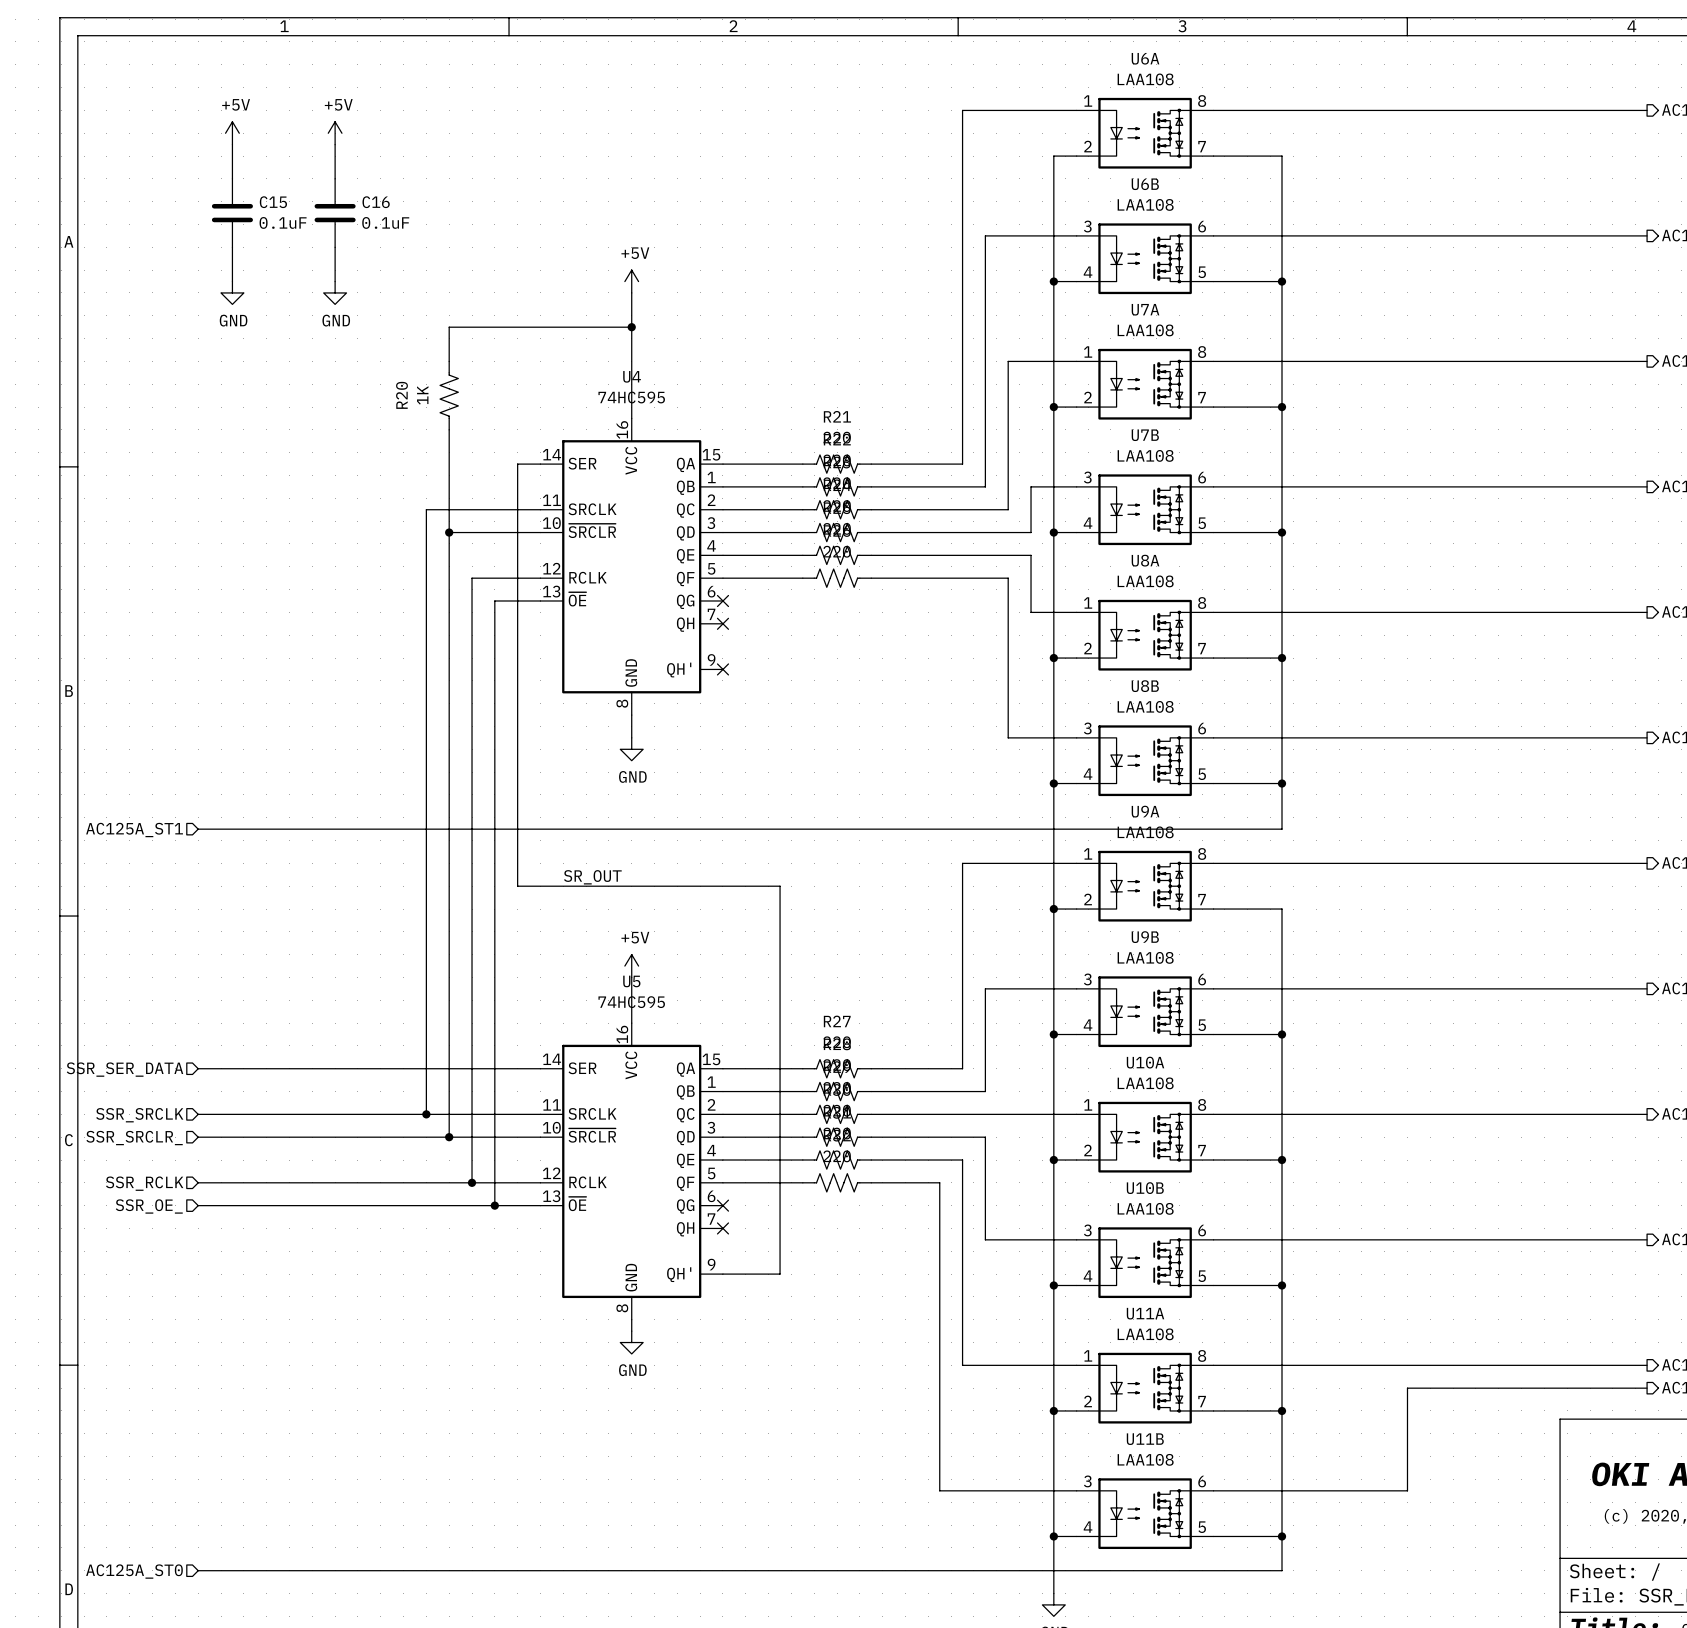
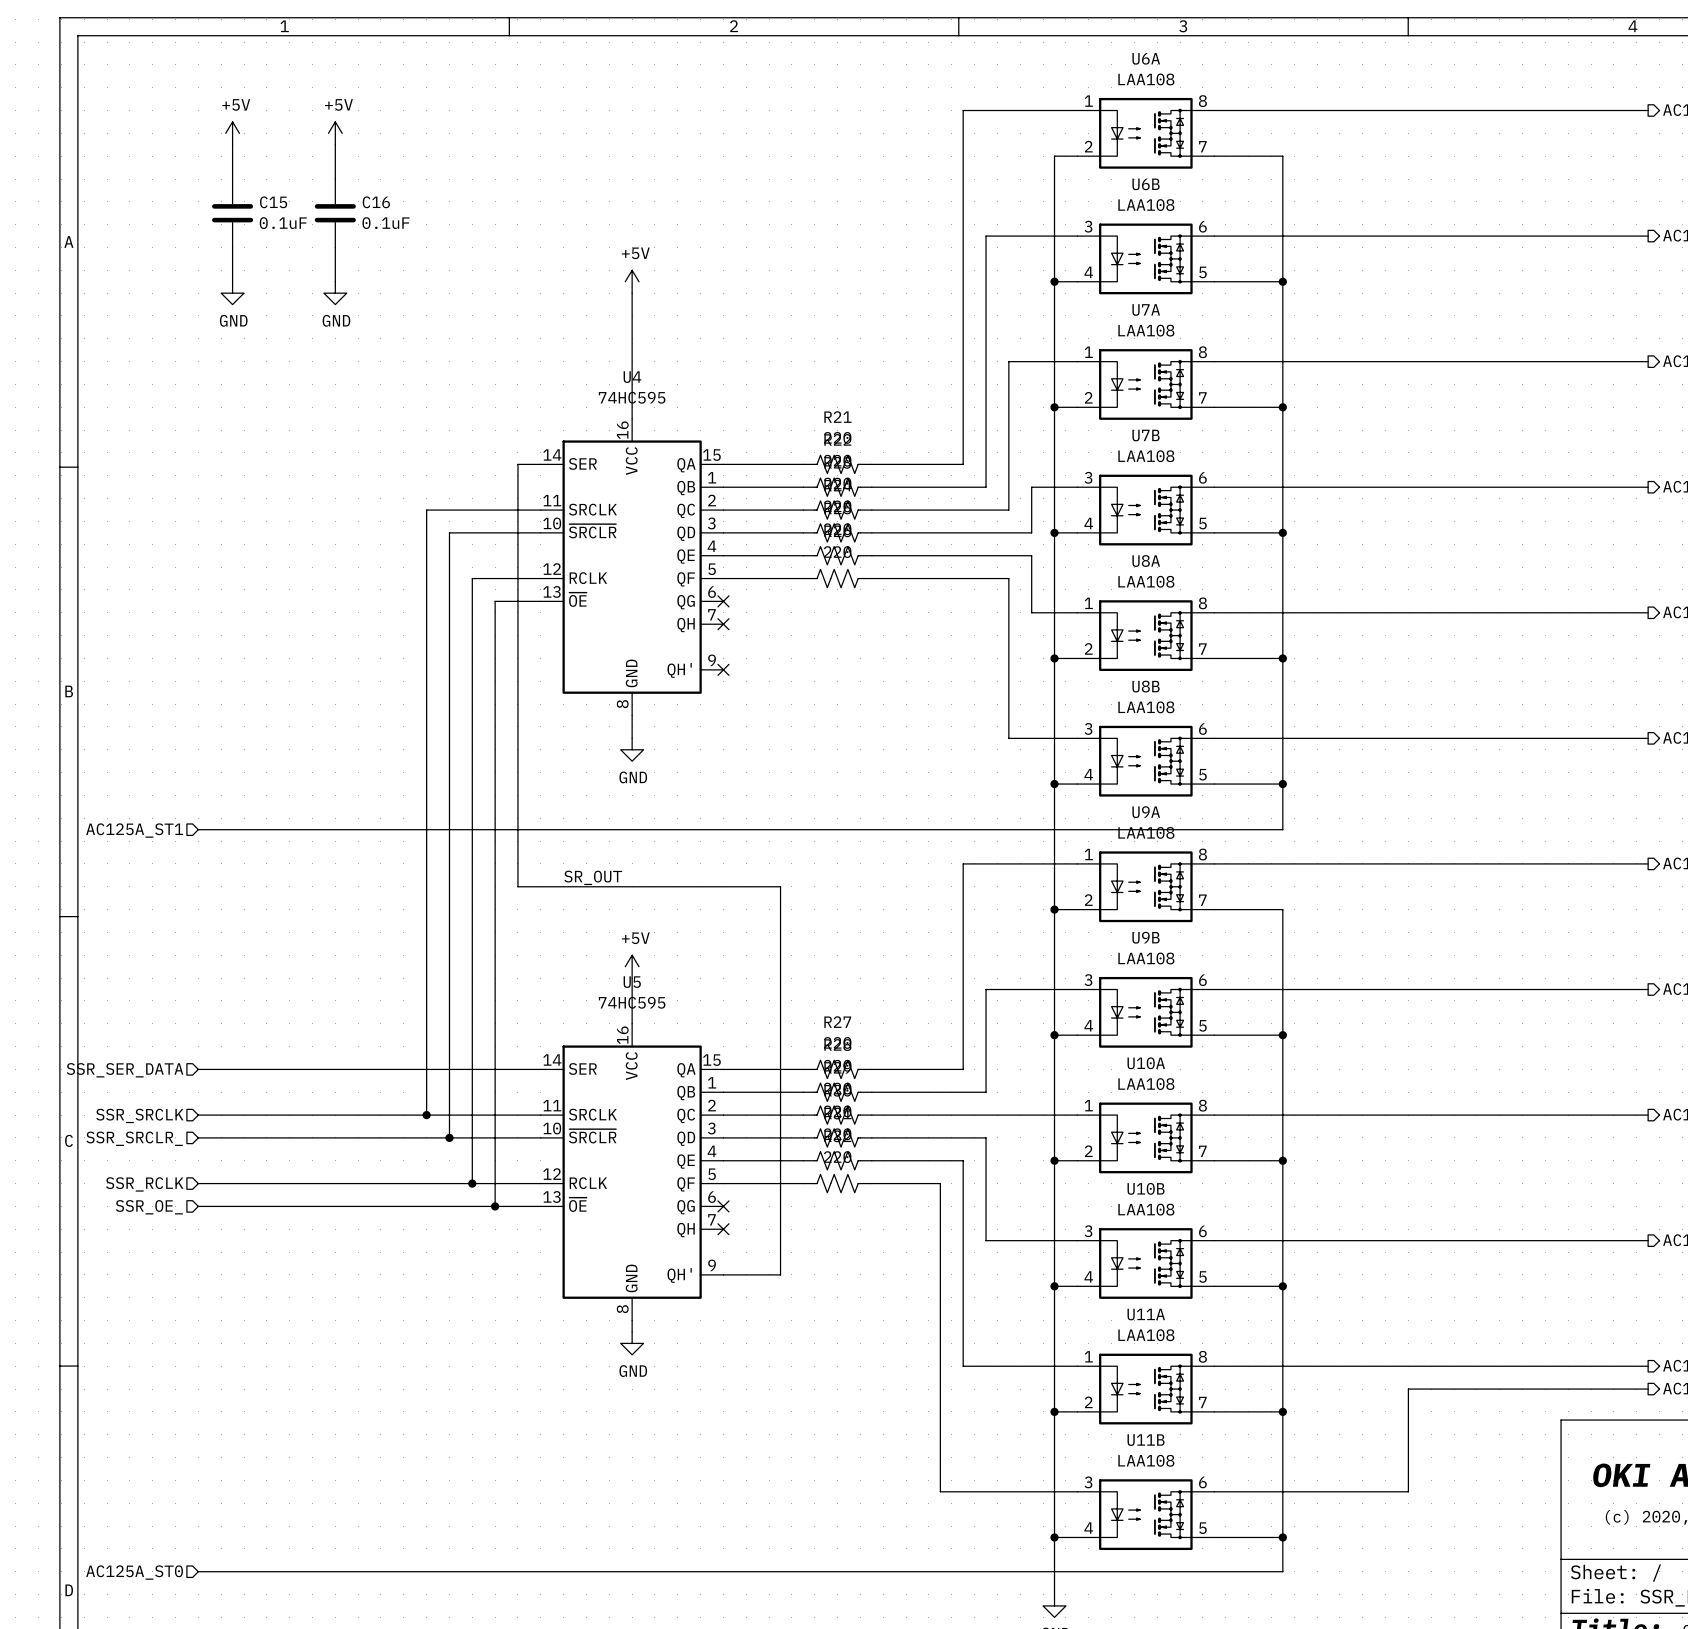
wire: (631, 327) (449, 327) (449, 361) -> none
junction: (631, 327) -> none
R20: 1K (449, 395) -> none
wire: (449, 429) (449, 532) -> none
junction: (449, 532) -> none

